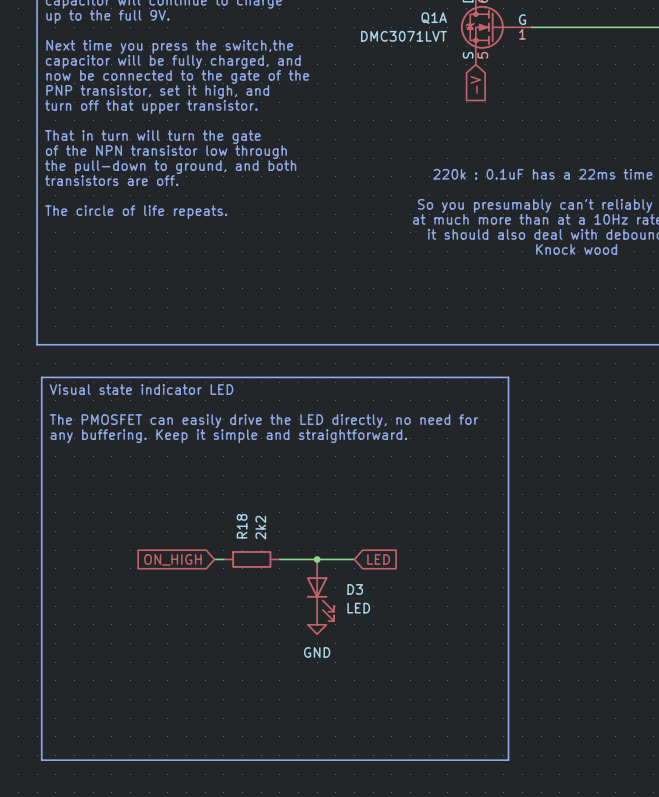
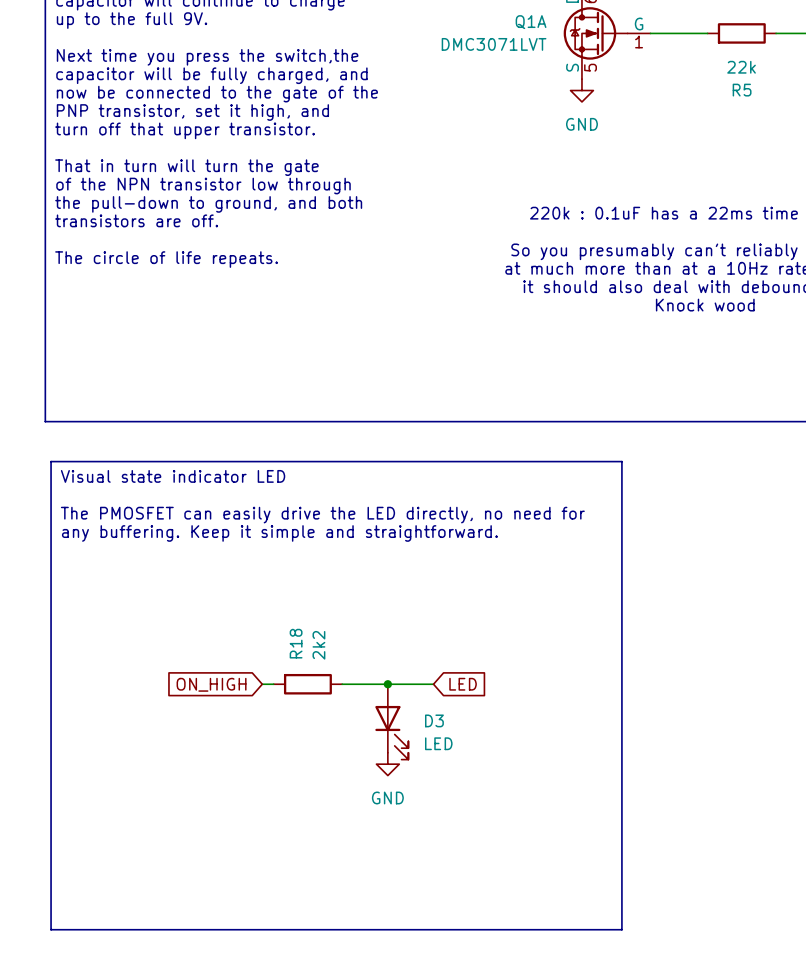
wire: (578, 27) (634, 27) -> none
R5: none -> 22k (741, 33)
power symbol: none -> GND (581, 90)
global label: -V (475, 85) -> none

